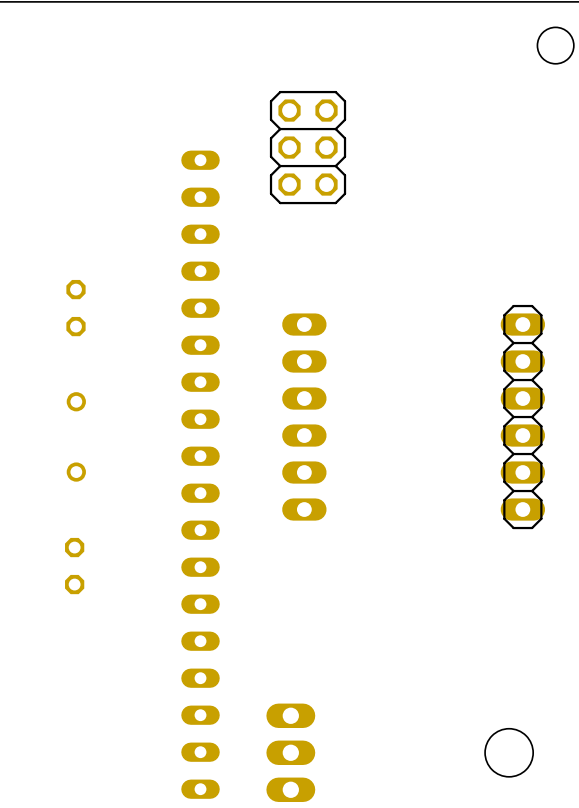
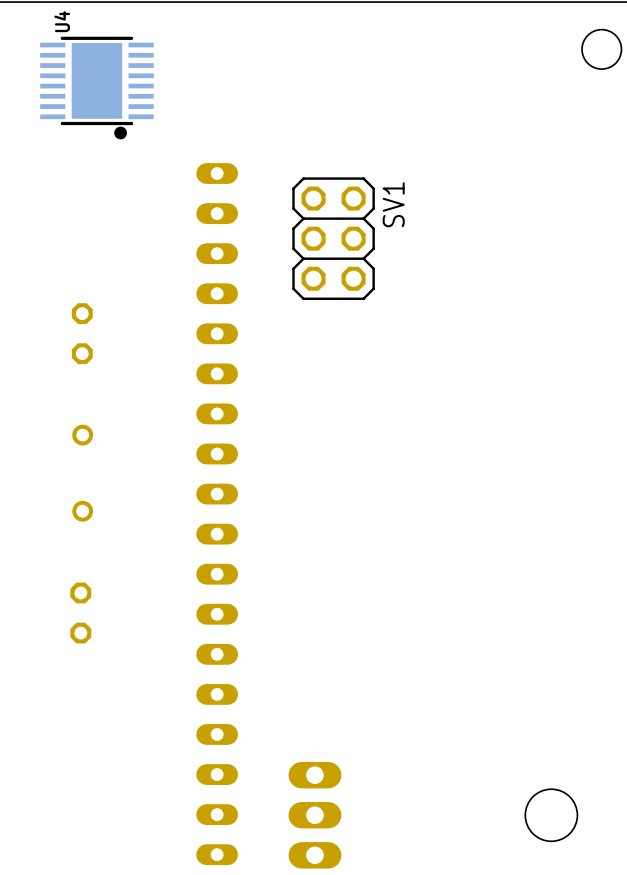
U4: none -> (96, 88)
part: (308, 147) -> none
SV1: none -> (333, 238)
part: (304, 417) -> none
part: (522, 417) -> none

